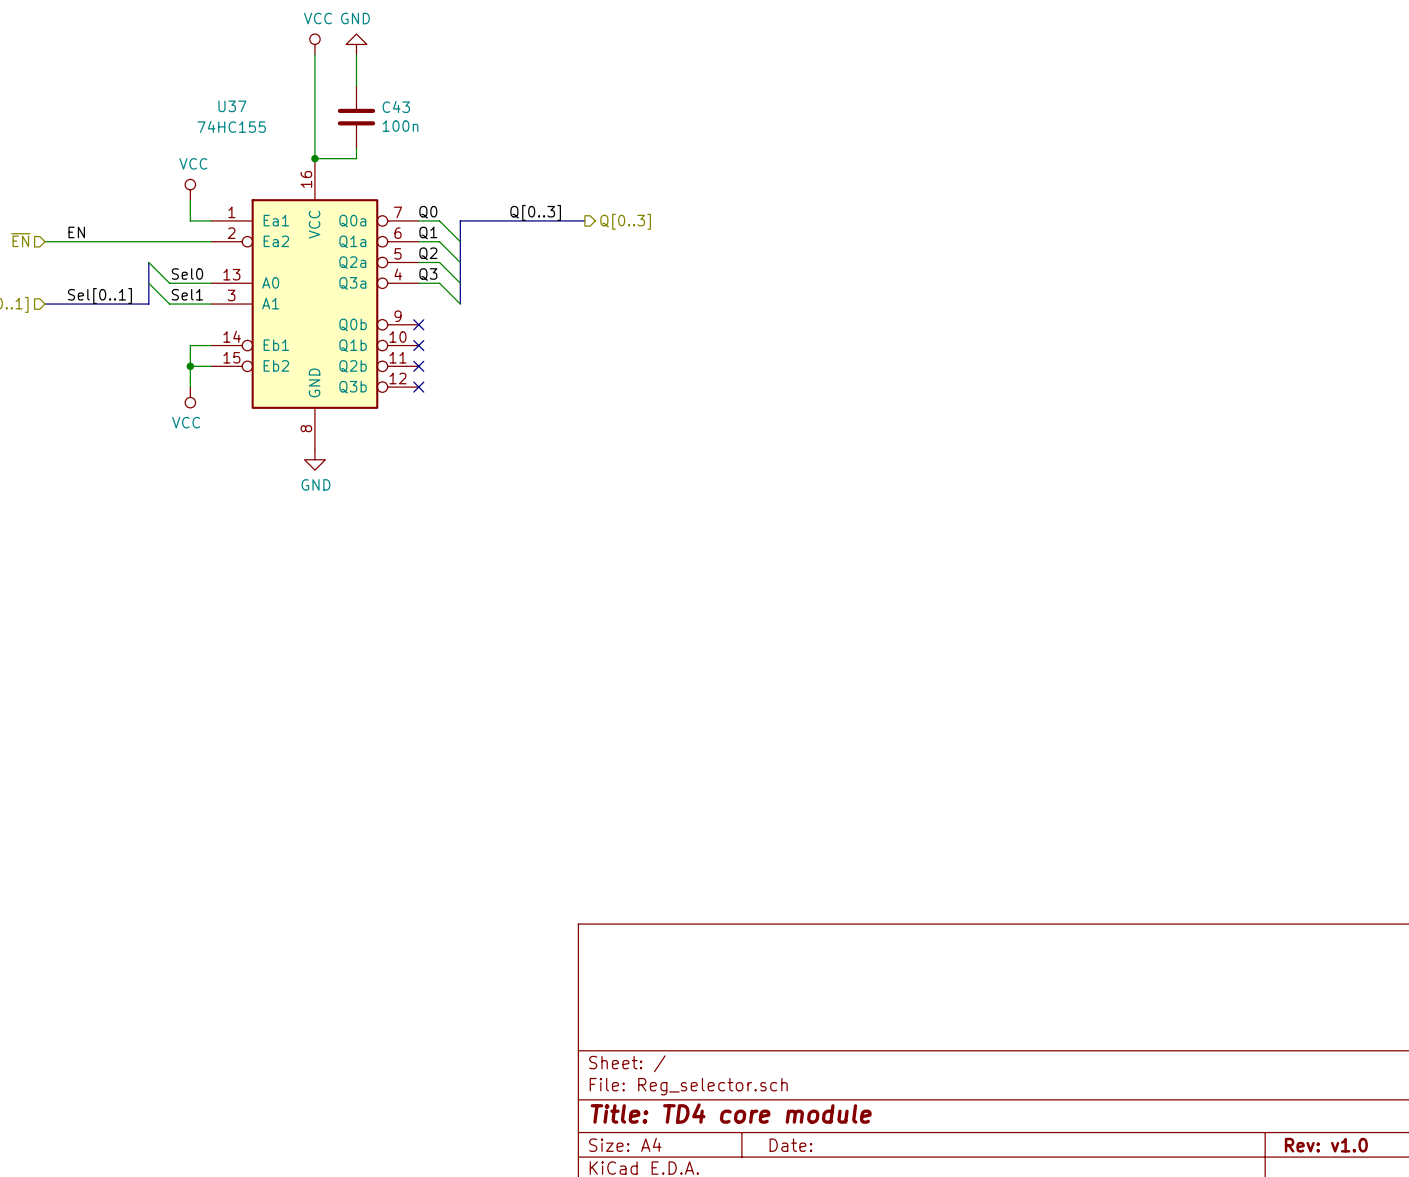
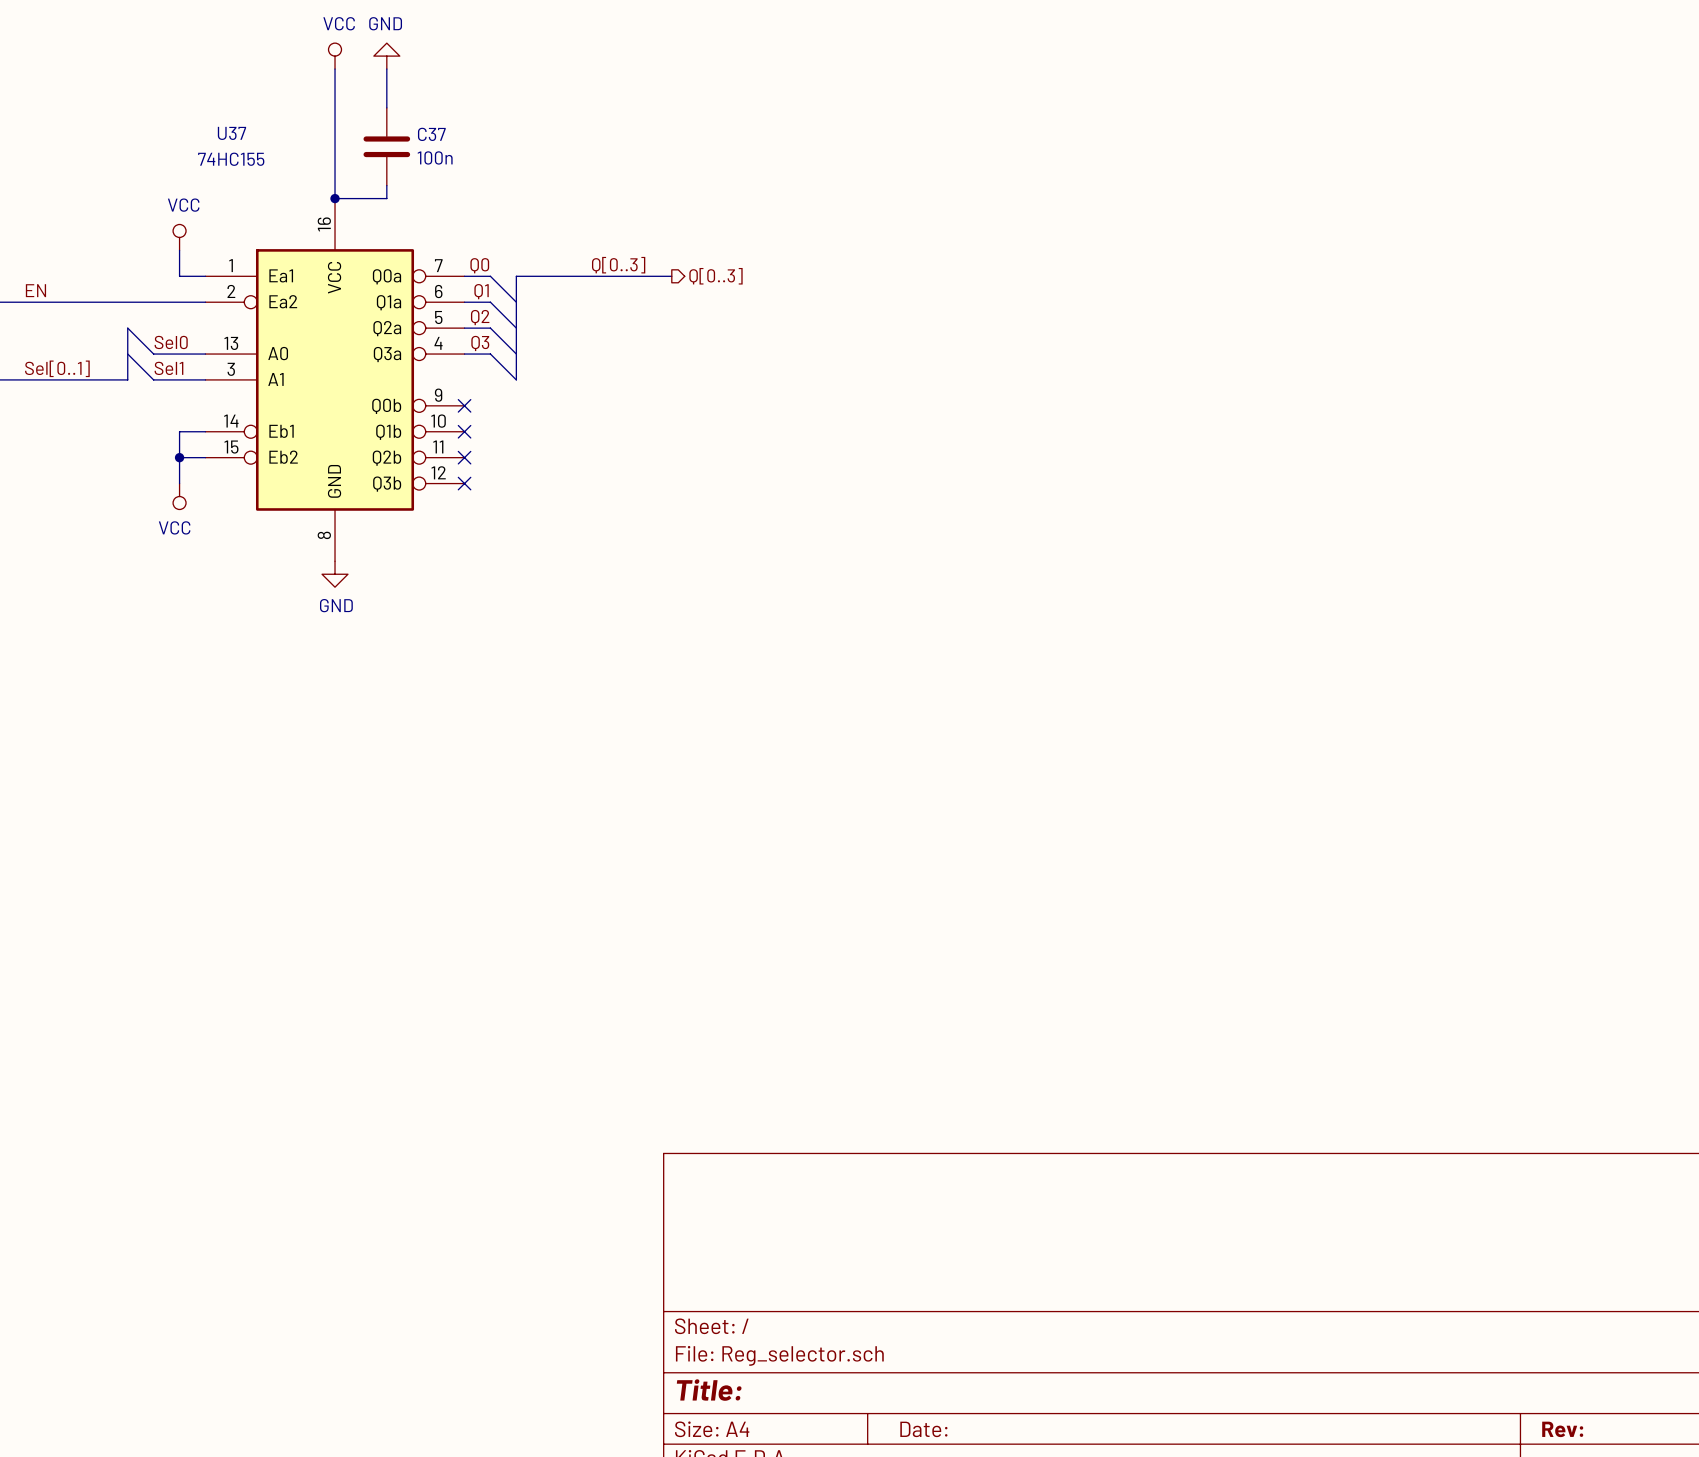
C43 name: C43 (396, 106) -> C37 (431, 134)
title block: Title: TD4 core module (731, 1113) -> Title: (709, 1390)
title block: Rev: v1.0 (1326, 1145) -> Rev: (1562, 1429)

